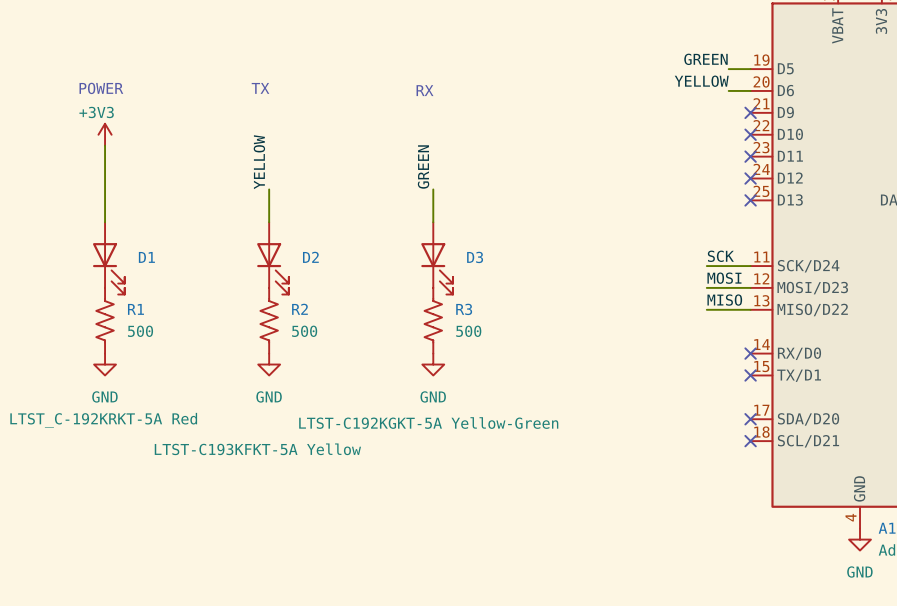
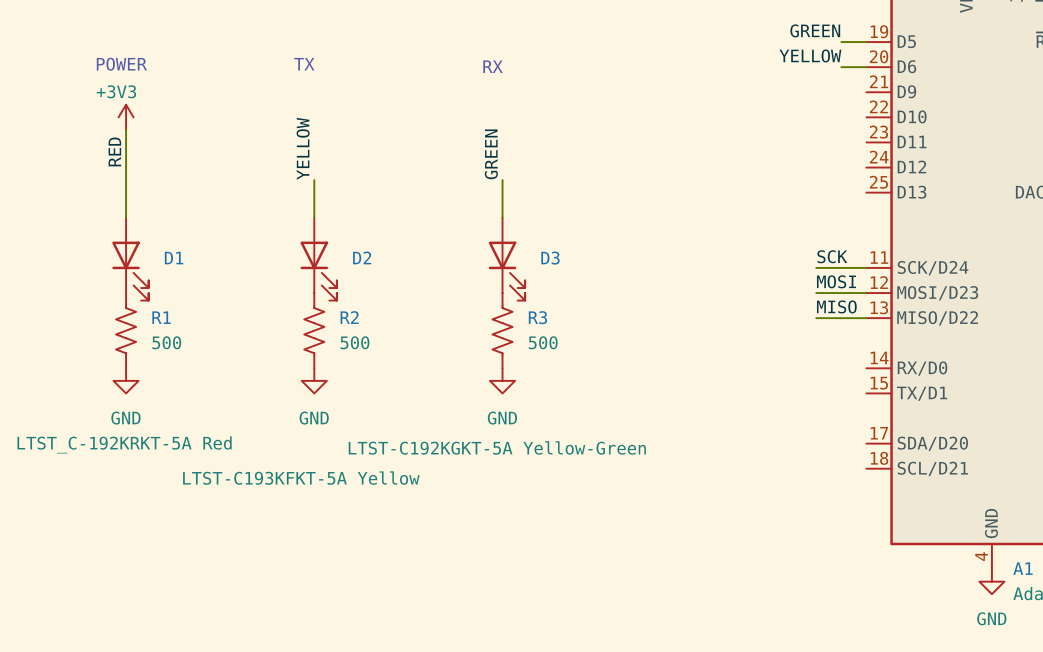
no-connect mark: (750, 112) -> none
no-connect mark: (750, 134) -> none
no-connect mark: (750, 156) -> none
label: none -> RED (114, 151)
no-connect mark: (750, 178) -> none
no-connect mark: (750, 200) -> none
no-connect mark: (750, 353) -> none
no-connect mark: (750, 375) -> none
no-connect mark: (750, 419) -> none
no-connect mark: (750, 441) -> none

